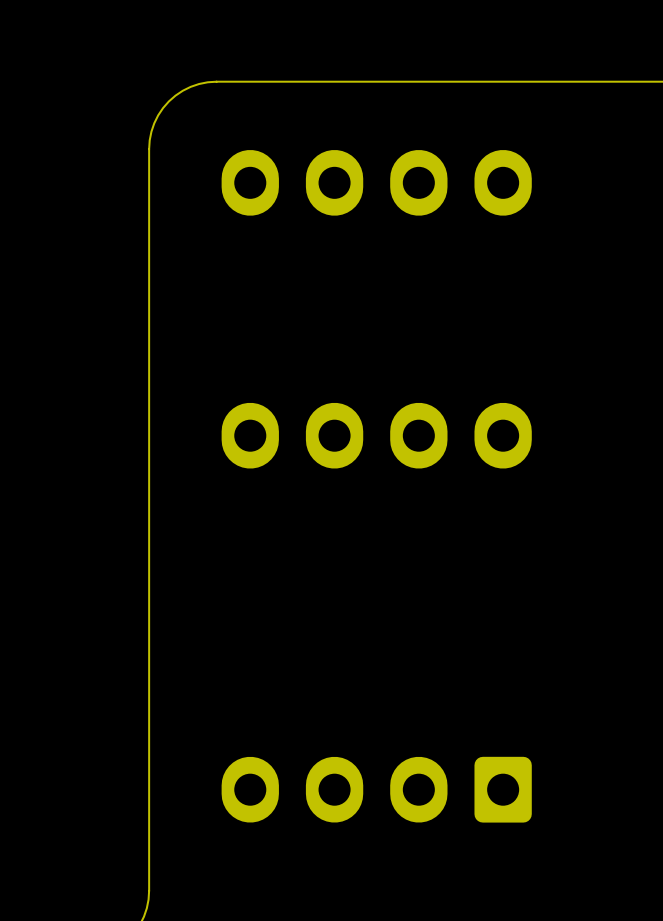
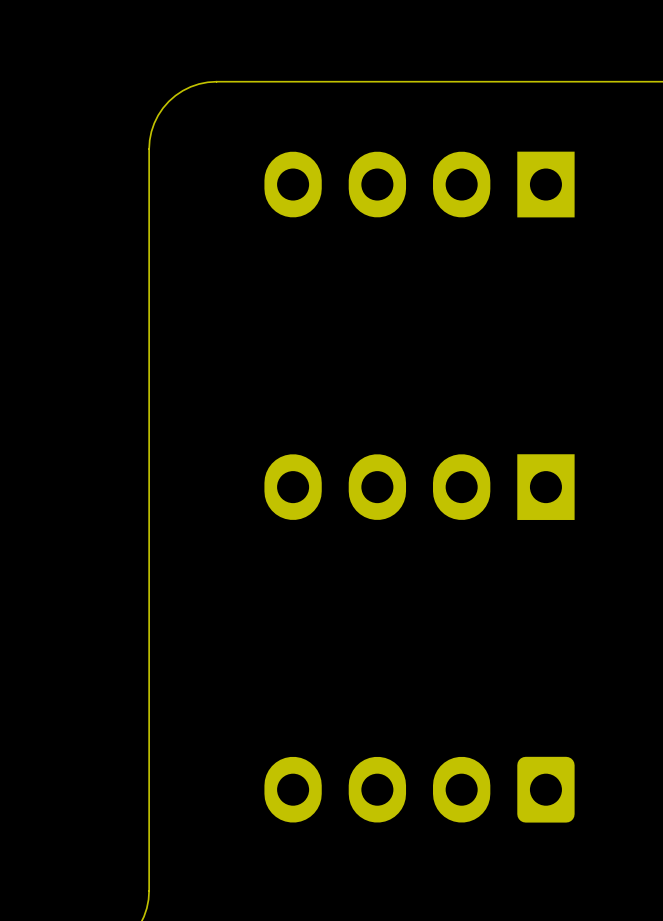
part: (376, 182) -> none
part: none -> (419, 184)
part: (376, 435) -> none
part: none -> (419, 487)
part position: (376, 789) -> (419, 789)

